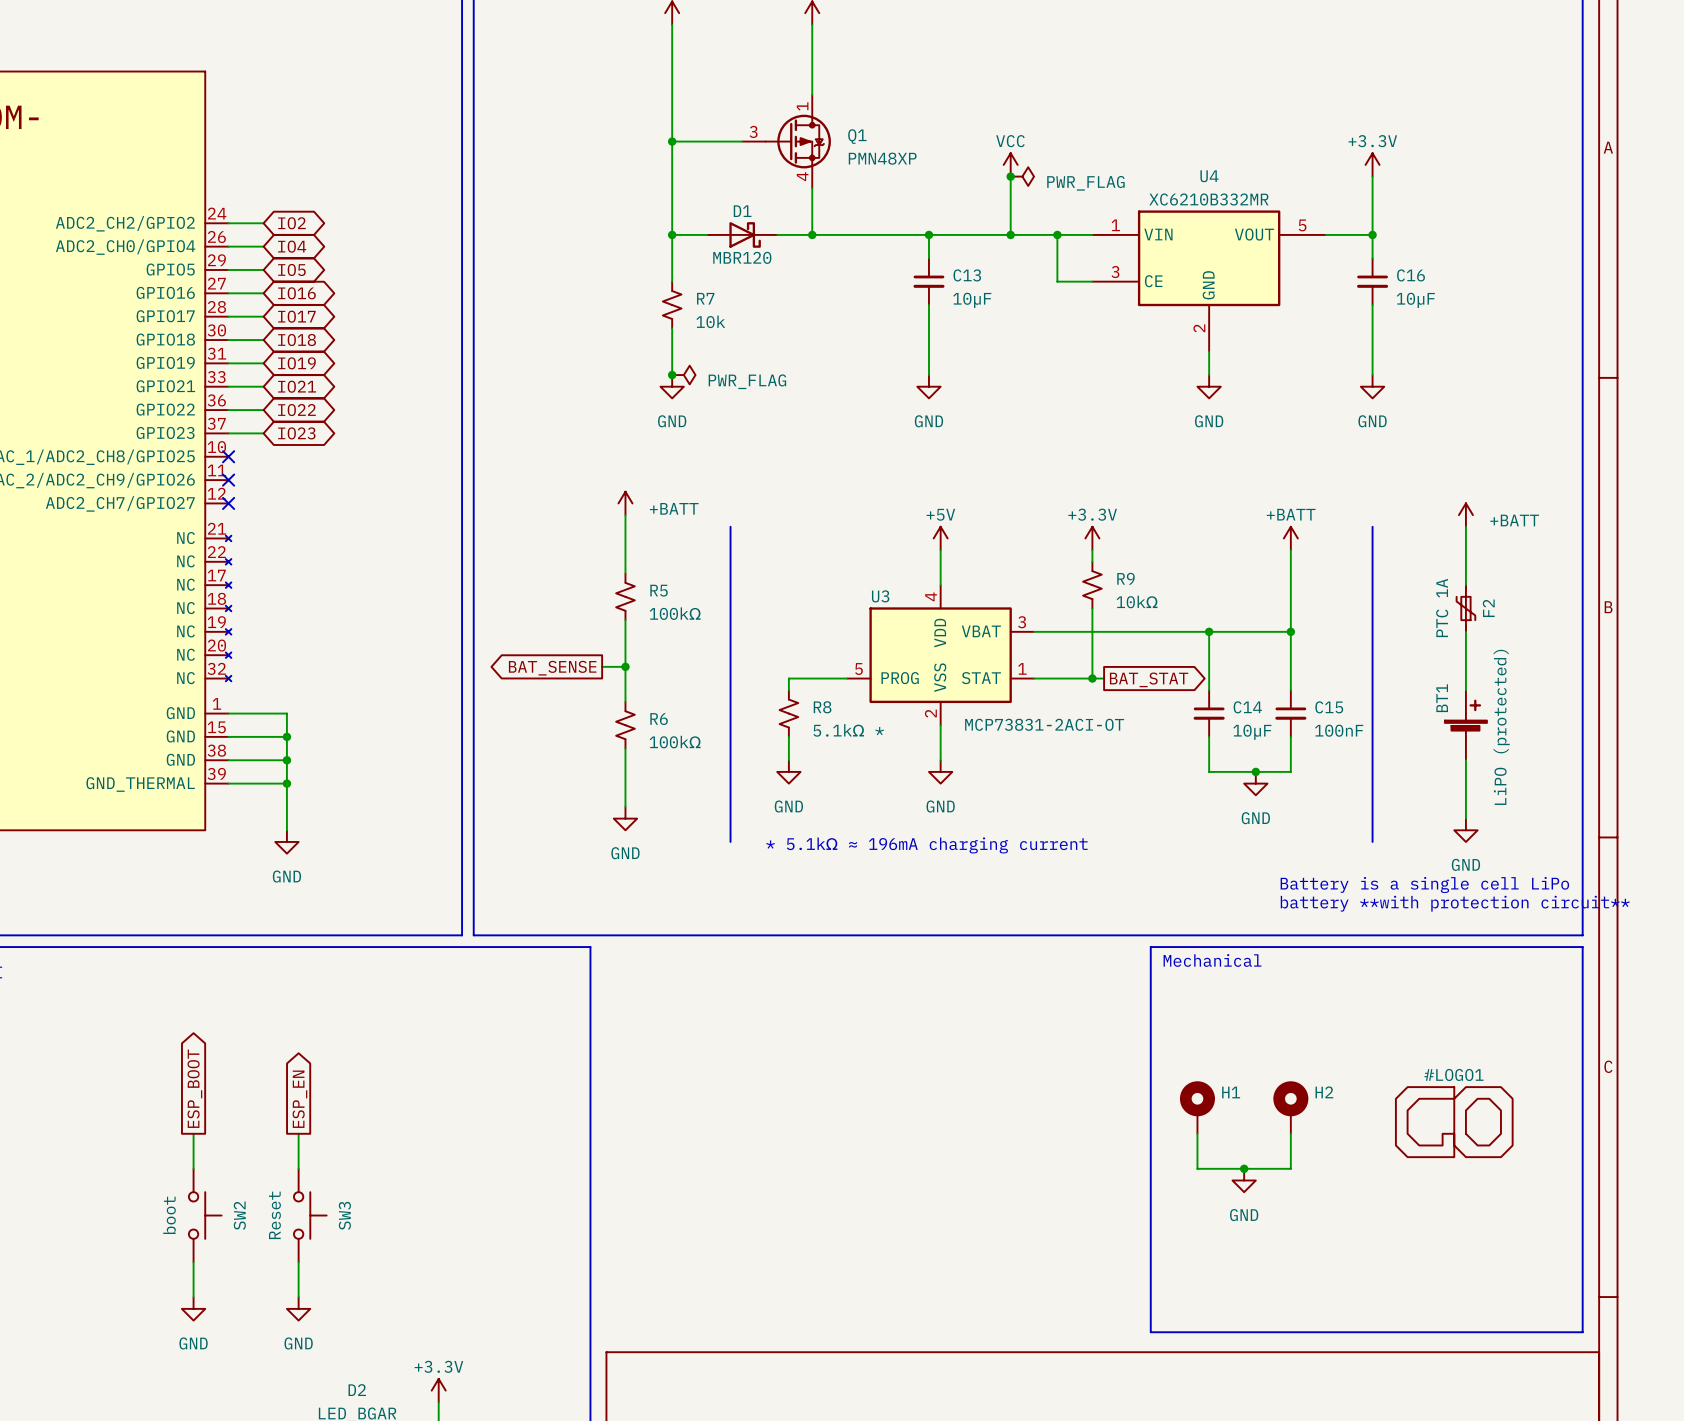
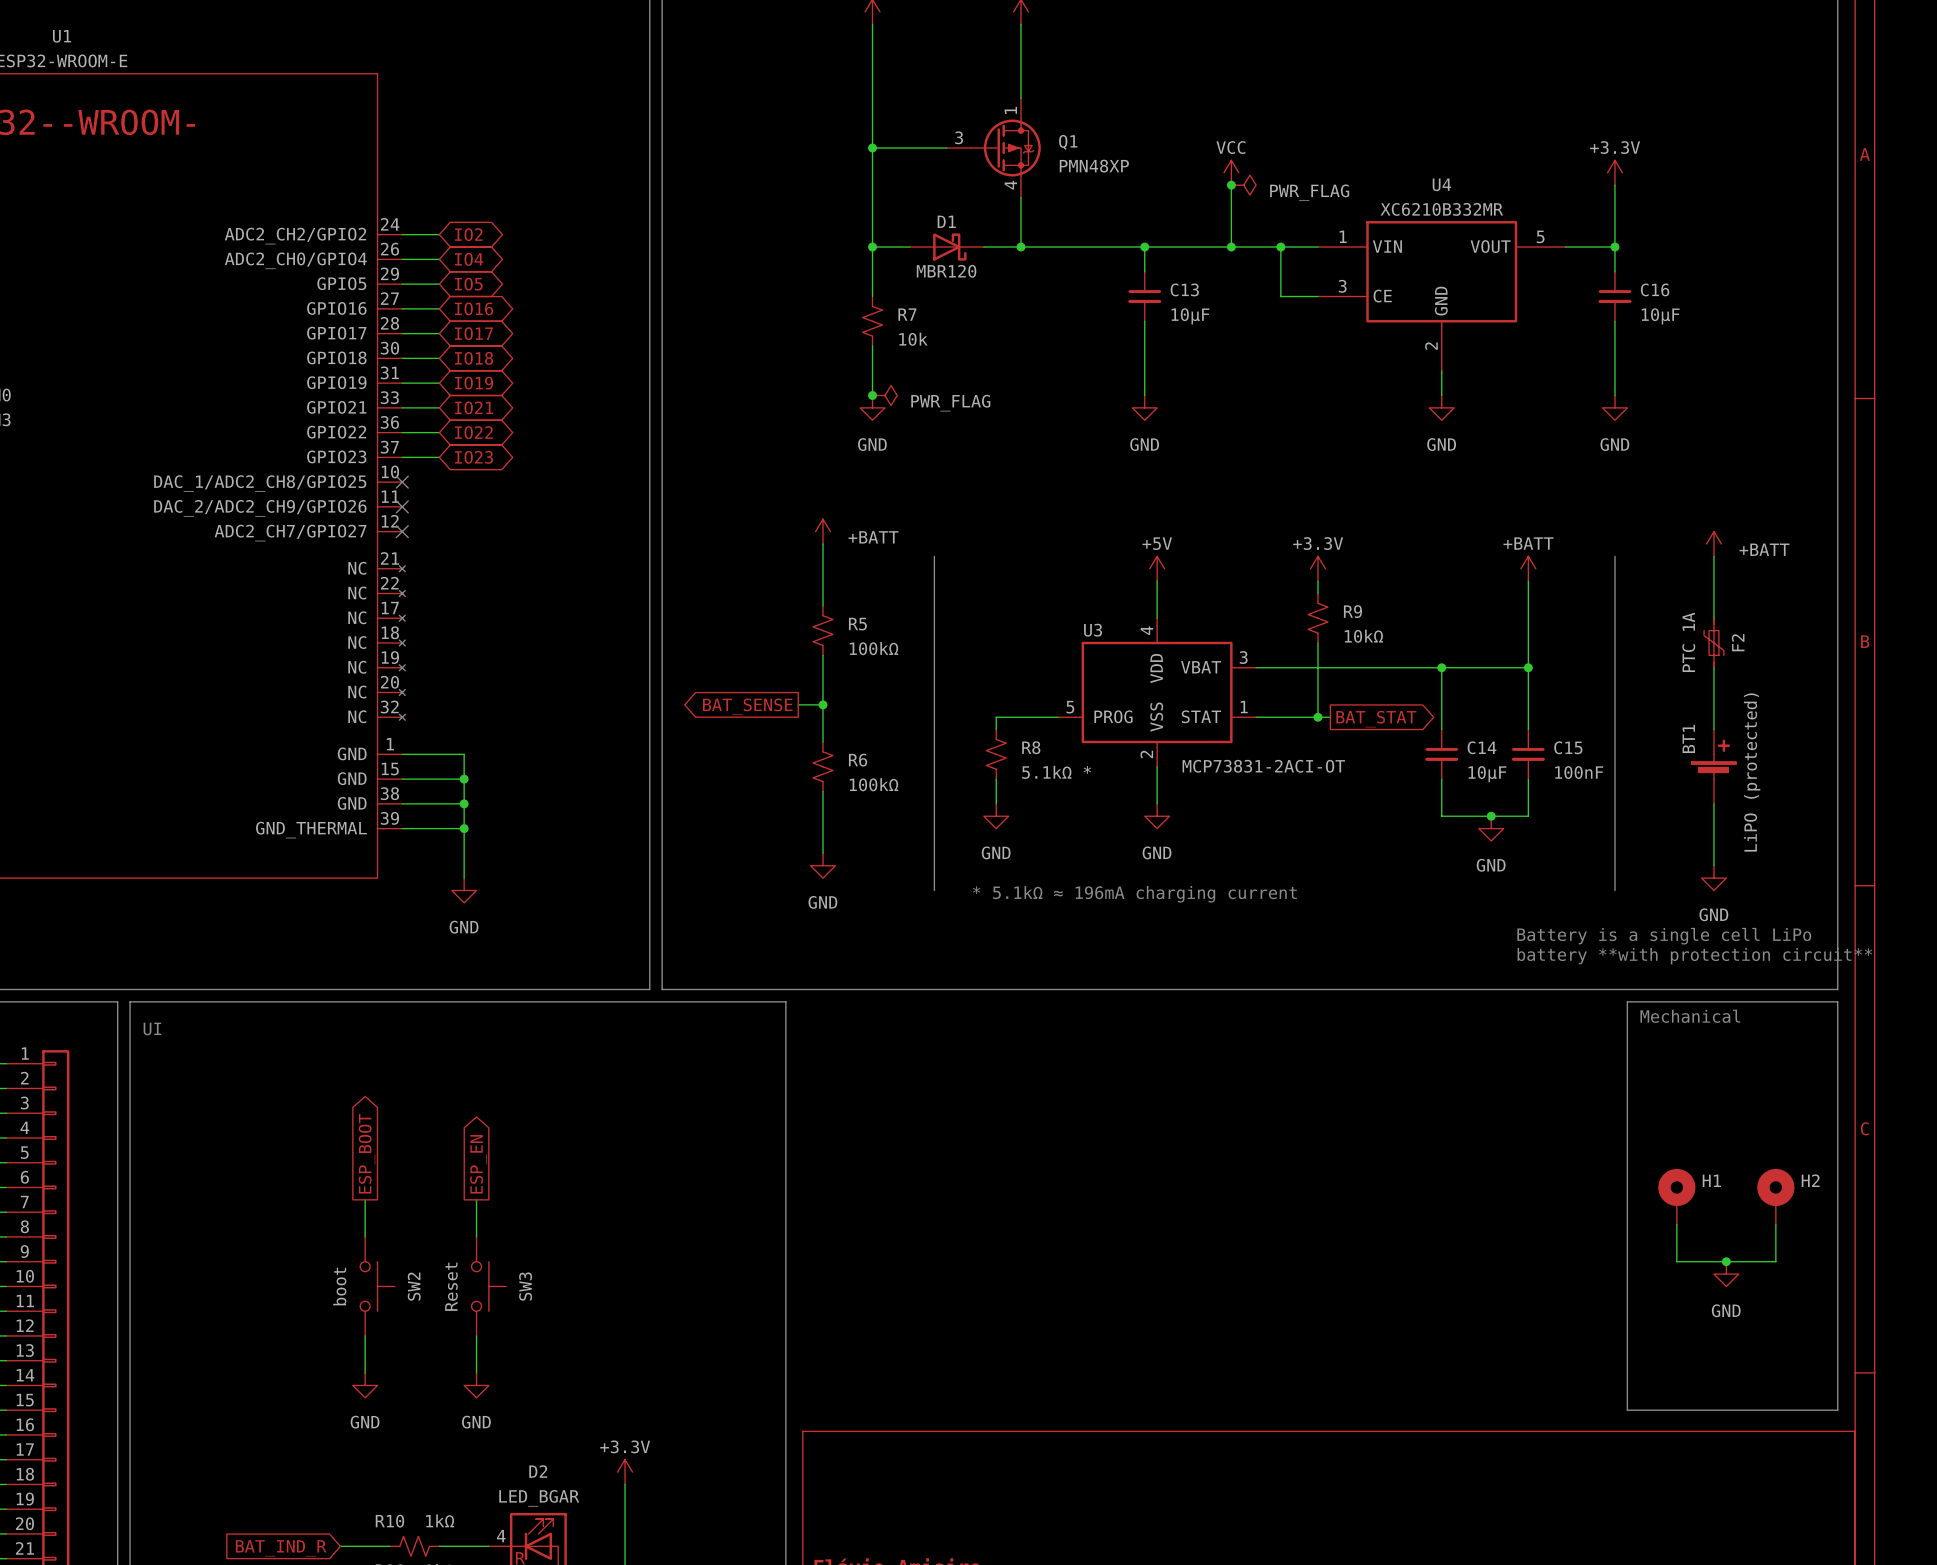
line: (1384, 947) (1150, 947) (1150, 1332) (1384, 1332) -> (1627, 1001) (1627, 1410)
text: Mechanical (1212, 960) -> none
text: none -> Mechanical (1690, 1016)
H1 position: (1197, 1107) -> (1676, 1196)
H2 position: (1290, 1107) -> (1775, 1196)
#LOGO1: (1454, 1122) -> none
wire: (1197, 1133) (1197, 1168) (1290, 1168) (1290, 1133) -> none
wire: none -> (1676, 1224) (1676, 1261) (1775, 1261) (1775, 1224)
junction: (1244, 1168) -> none
power symbol: GND (1244, 1180) -> none
junction: none -> (1726, 1261)
power symbol: none -> GND (1726, 1274)

